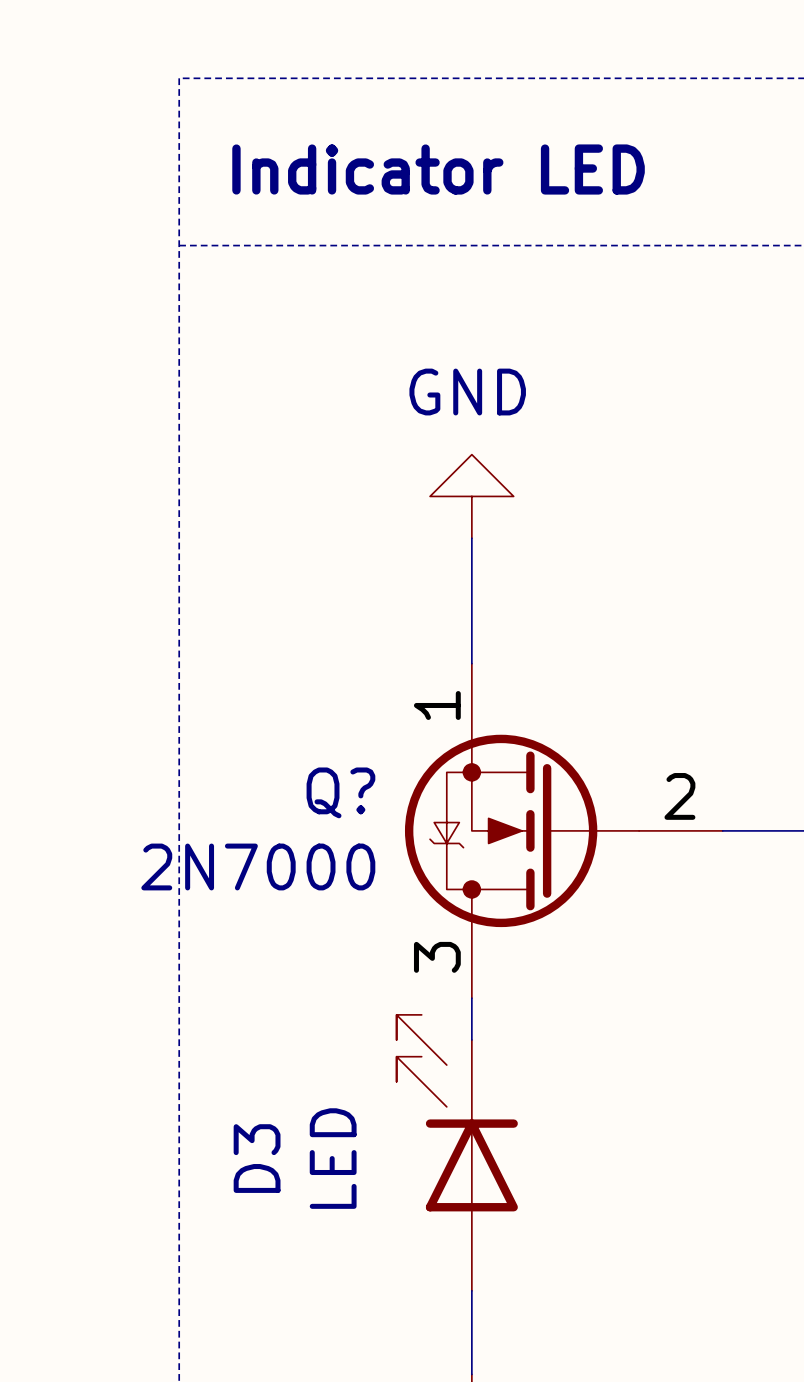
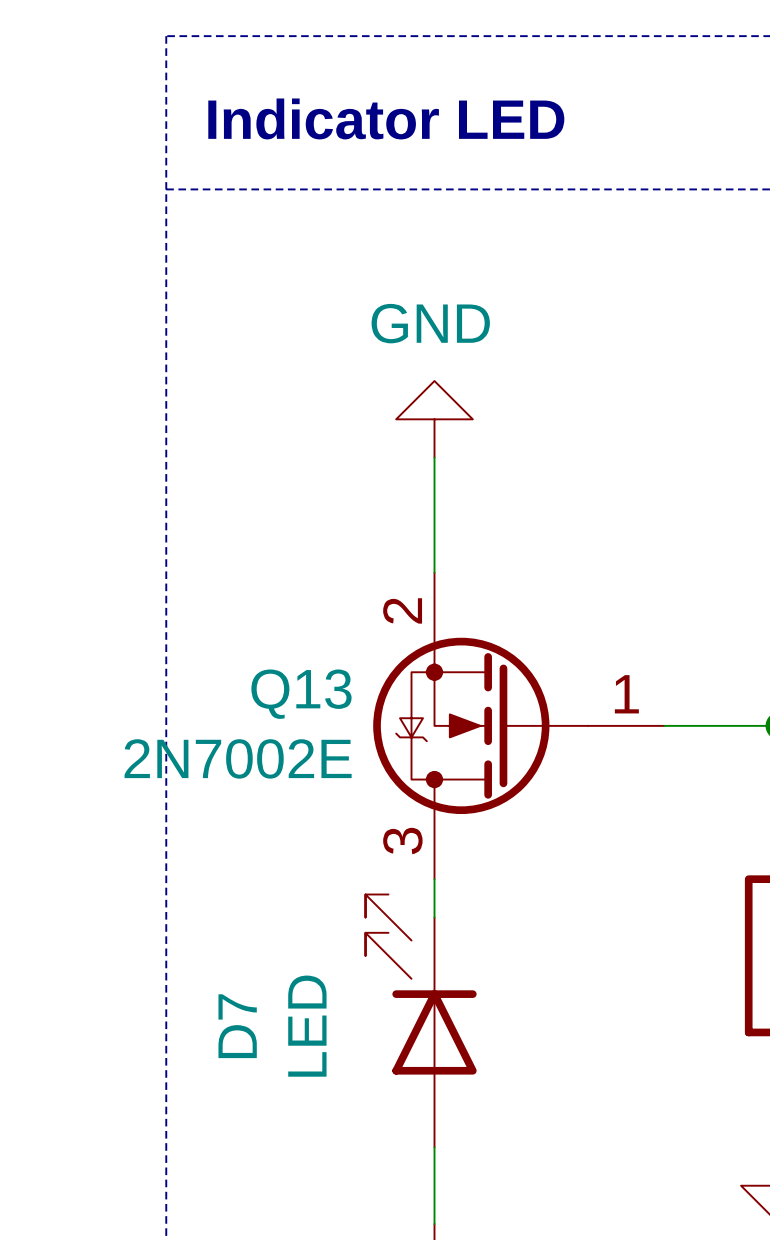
Q? pin number: 1 (437, 705) -> 2 (402, 610)
Q? name: Q? (340, 792) -> Q13 (301, 694)
Q? pin number: 2 (679, 796) -> 1 (626, 694)
Q? value: 2N7000 (258, 866) -> 2N7002E (238, 758)
D3 name: D3 (257, 1158) -> D7 (237, 1026)

